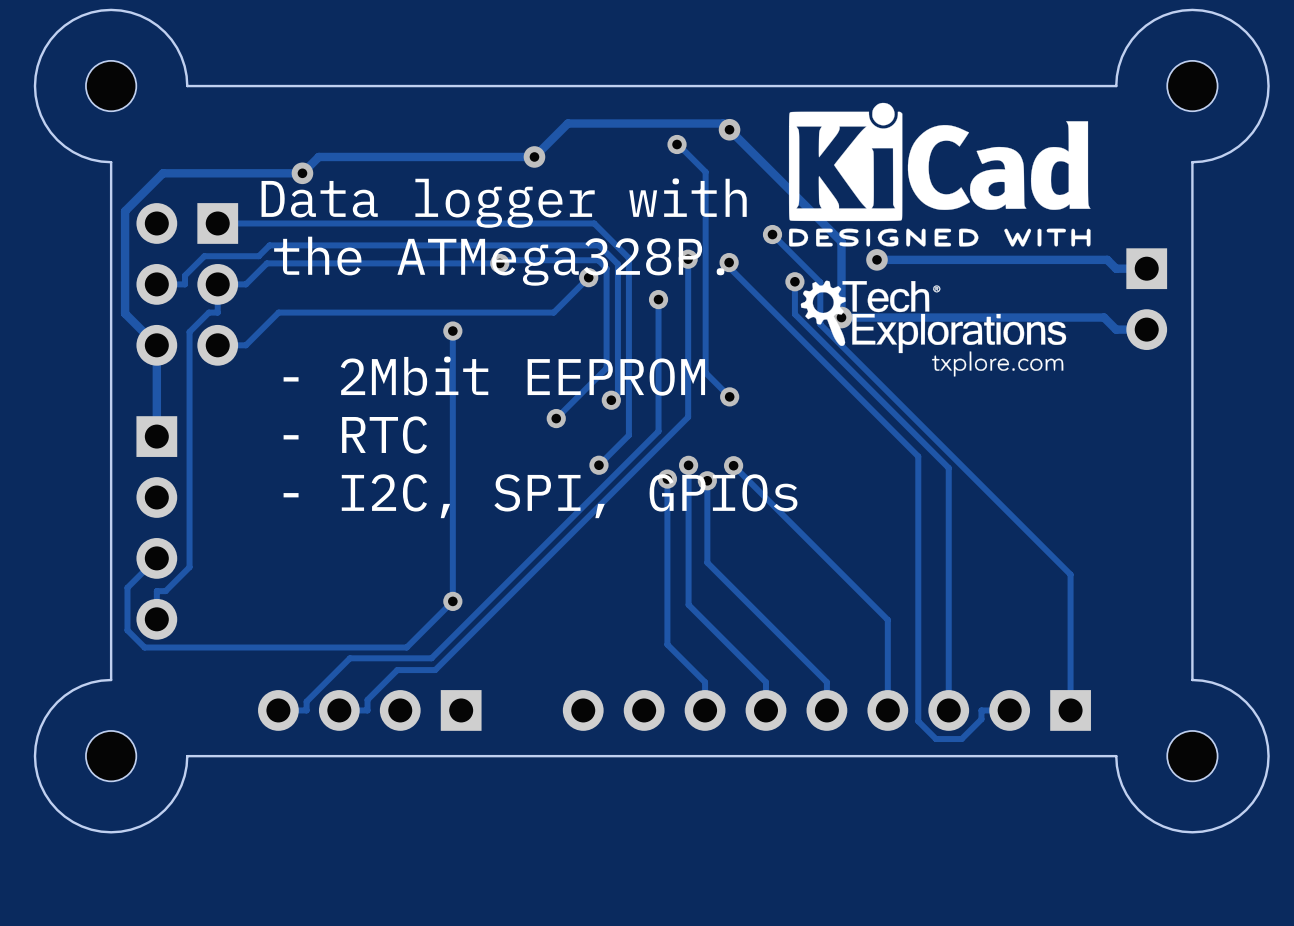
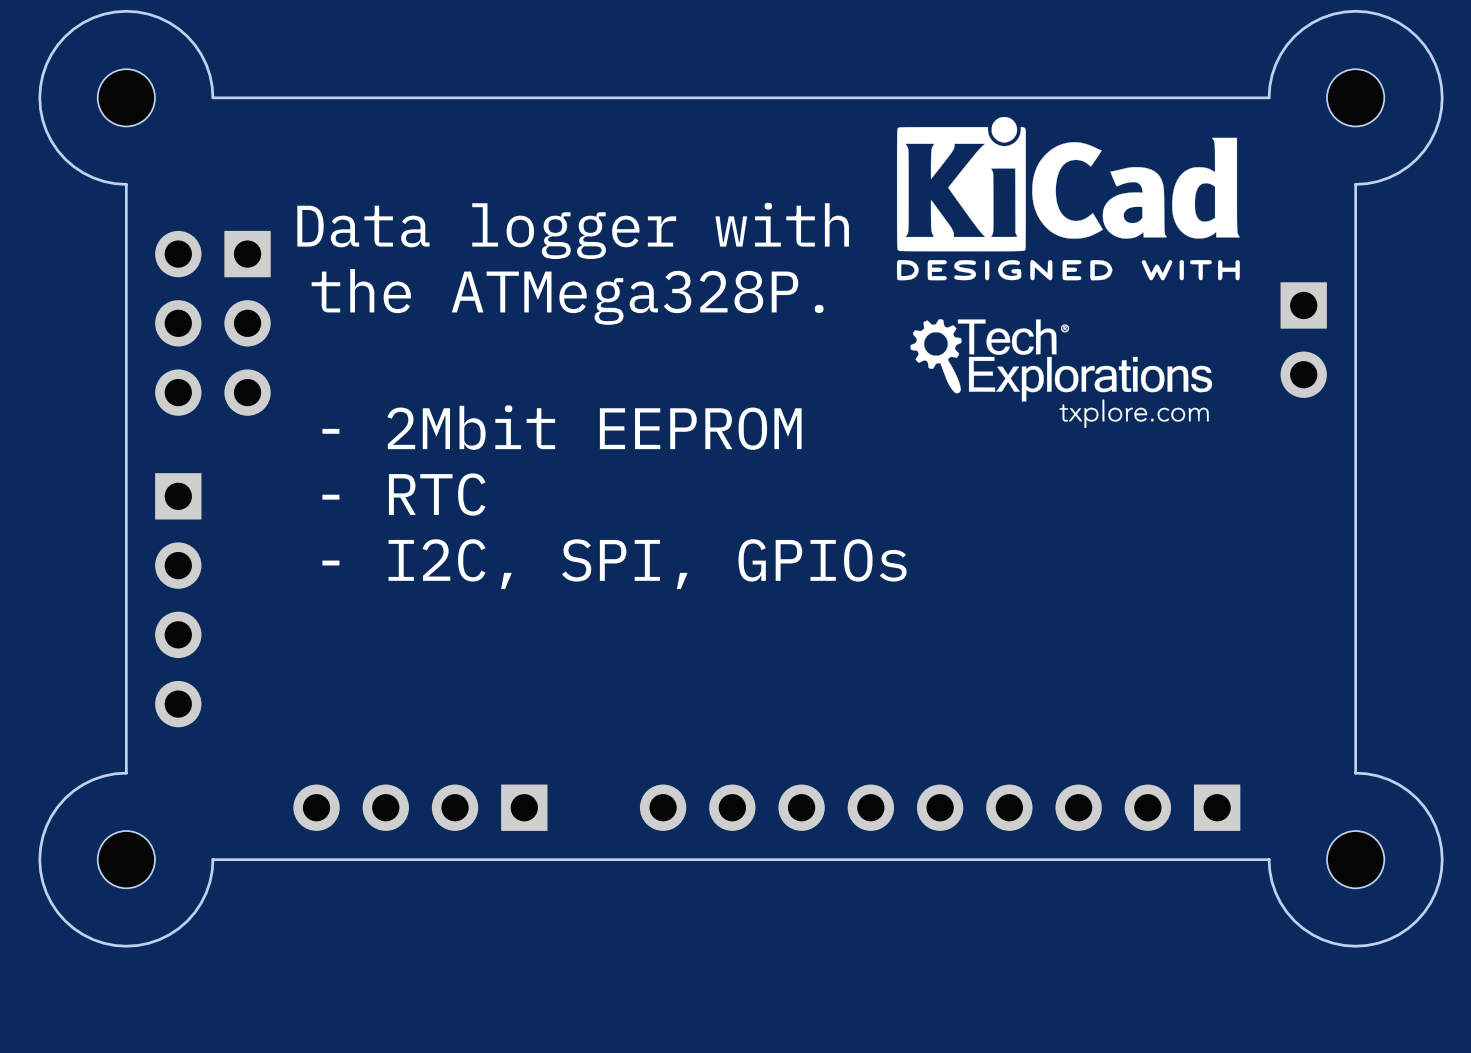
via: (729, 129) -> none
track: (677, 144) (705, 172) (705, 372) (729, 396) -> none
via: (677, 144) -> none
via: (534, 156) -> none
via: (302, 173) -> none
track: (217, 223) (594, 223) (628, 258) (628, 435) (598, 465) -> none
track: (772, 234) (820, 282) (820, 324) (1070, 574) (1070, 710) -> none
via: (772, 234) -> none
track: (688, 259) (688, 417) (435, 670) (397, 670) (367, 699) (367, 710) (339, 710) -> none
via: (688, 259) -> none
track: (876, 259) (1107, 259) (1116, 268) (1146, 268) -> none
via: (876, 259) -> none
track: (729, 262) (729, 267) (918, 456) (918, 721) (935, 739) (961, 739) (981, 719) (981, 710) (1009, 710) -> none
via: (729, 262) -> none
via: (499, 263) -> none
track: (588, 277) (553, 312) (278, 312) (245, 345) (217, 345) -> none
via: (588, 277) -> none
track: (794, 281) (794, 314) (948, 468) (948, 710) -> none
via: (794, 281) -> none
track: (156, 284) (185, 284) (185, 275) (204, 256) (258, 256) (269, 245) (599, 245) (617, 264) (617, 393) (611, 400) -> none
track: (658, 299) (658, 431) (431, 658) (349, 658) (306, 701) (306, 710) (278, 710) -> none
via: (658, 299) -> none
via: (841, 317) -> none
track: (1146, 329) (1116, 329) (1104, 317) (841, 317) (841, 241) (723, 123) (567, 123) (534, 156) (318, 156) (302, 173) (163, 173) (125, 211) (125, 313) (156, 345) (156, 436) -> none
track: (452, 331) (452, 601) (406, 647) (144, 647) (127, 630) (127, 587) (156, 558) -> none
via: (452, 331) -> none
via: (729, 396) -> none
via: (611, 400) -> none
track: (556, 418) (606, 368) (606, 268) (598, 260) (502, 260) (499, 263) (266, 263) (245, 284) (217, 284) (217, 312) (208, 312) (189, 331) (189, 567) (165, 591) (156, 591) (156, 619) -> none
via: (556, 418) -> none
via: (598, 465) -> none
track: (688, 465) (688, 604) (765, 682) (765, 710) -> none
via: (688, 465) -> none
track: (733, 465) (887, 619) (887, 710) -> none
via: (733, 465) -> none
track: (667, 479) (667, 644) (705, 682) (705, 710) -> none
via: (667, 479) -> none
track: (707, 480) (707, 562) (826, 682) (826, 710) -> none
via: (707, 480) -> none
via: (452, 601) -> none

